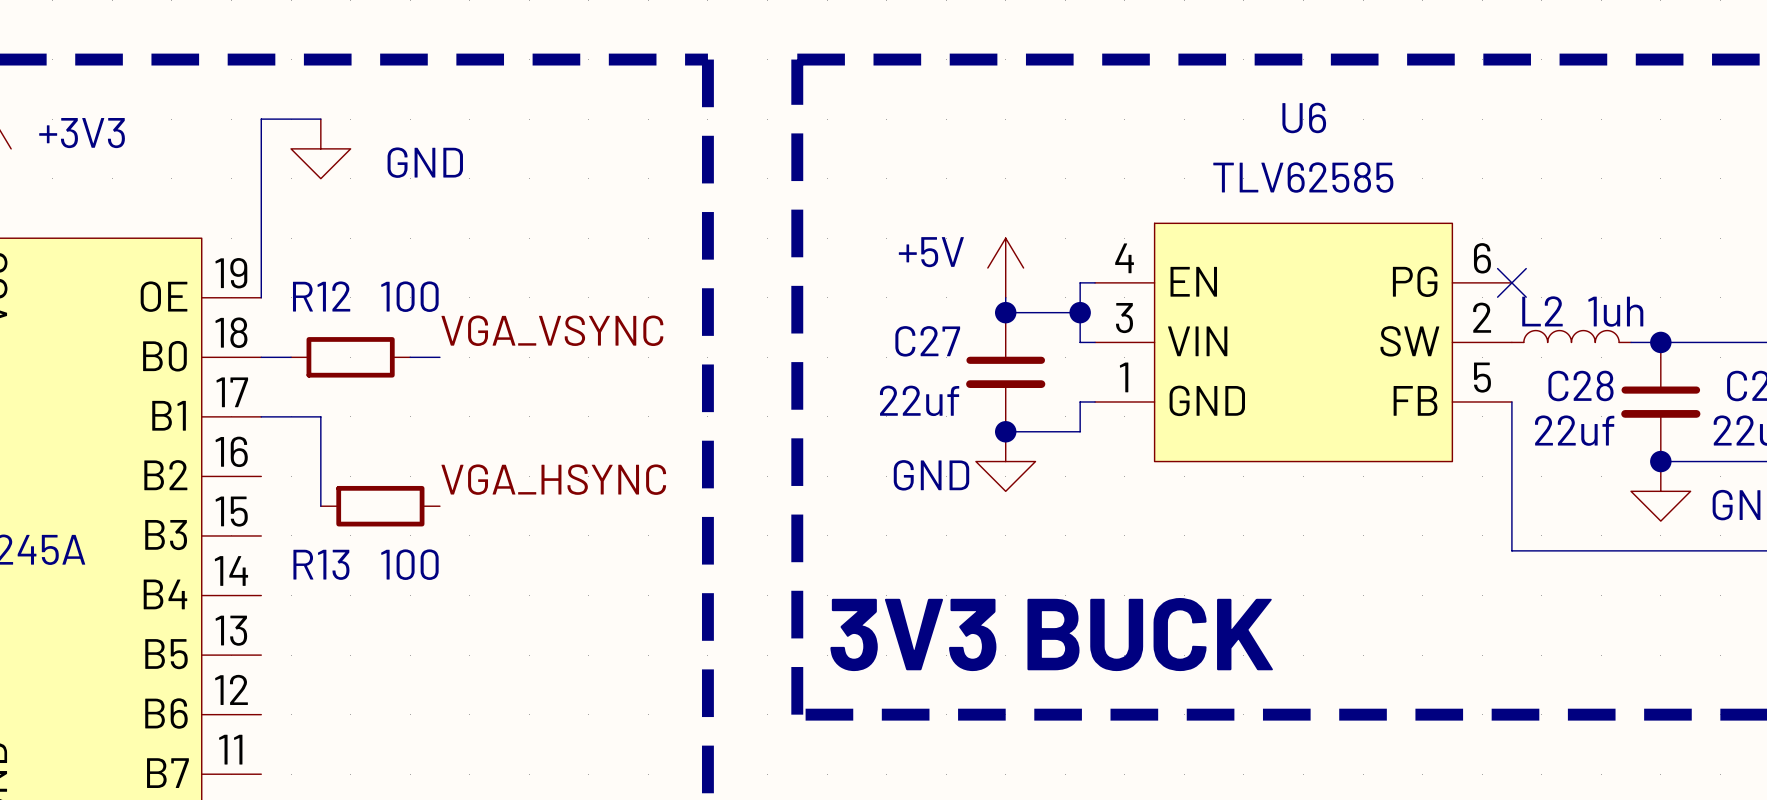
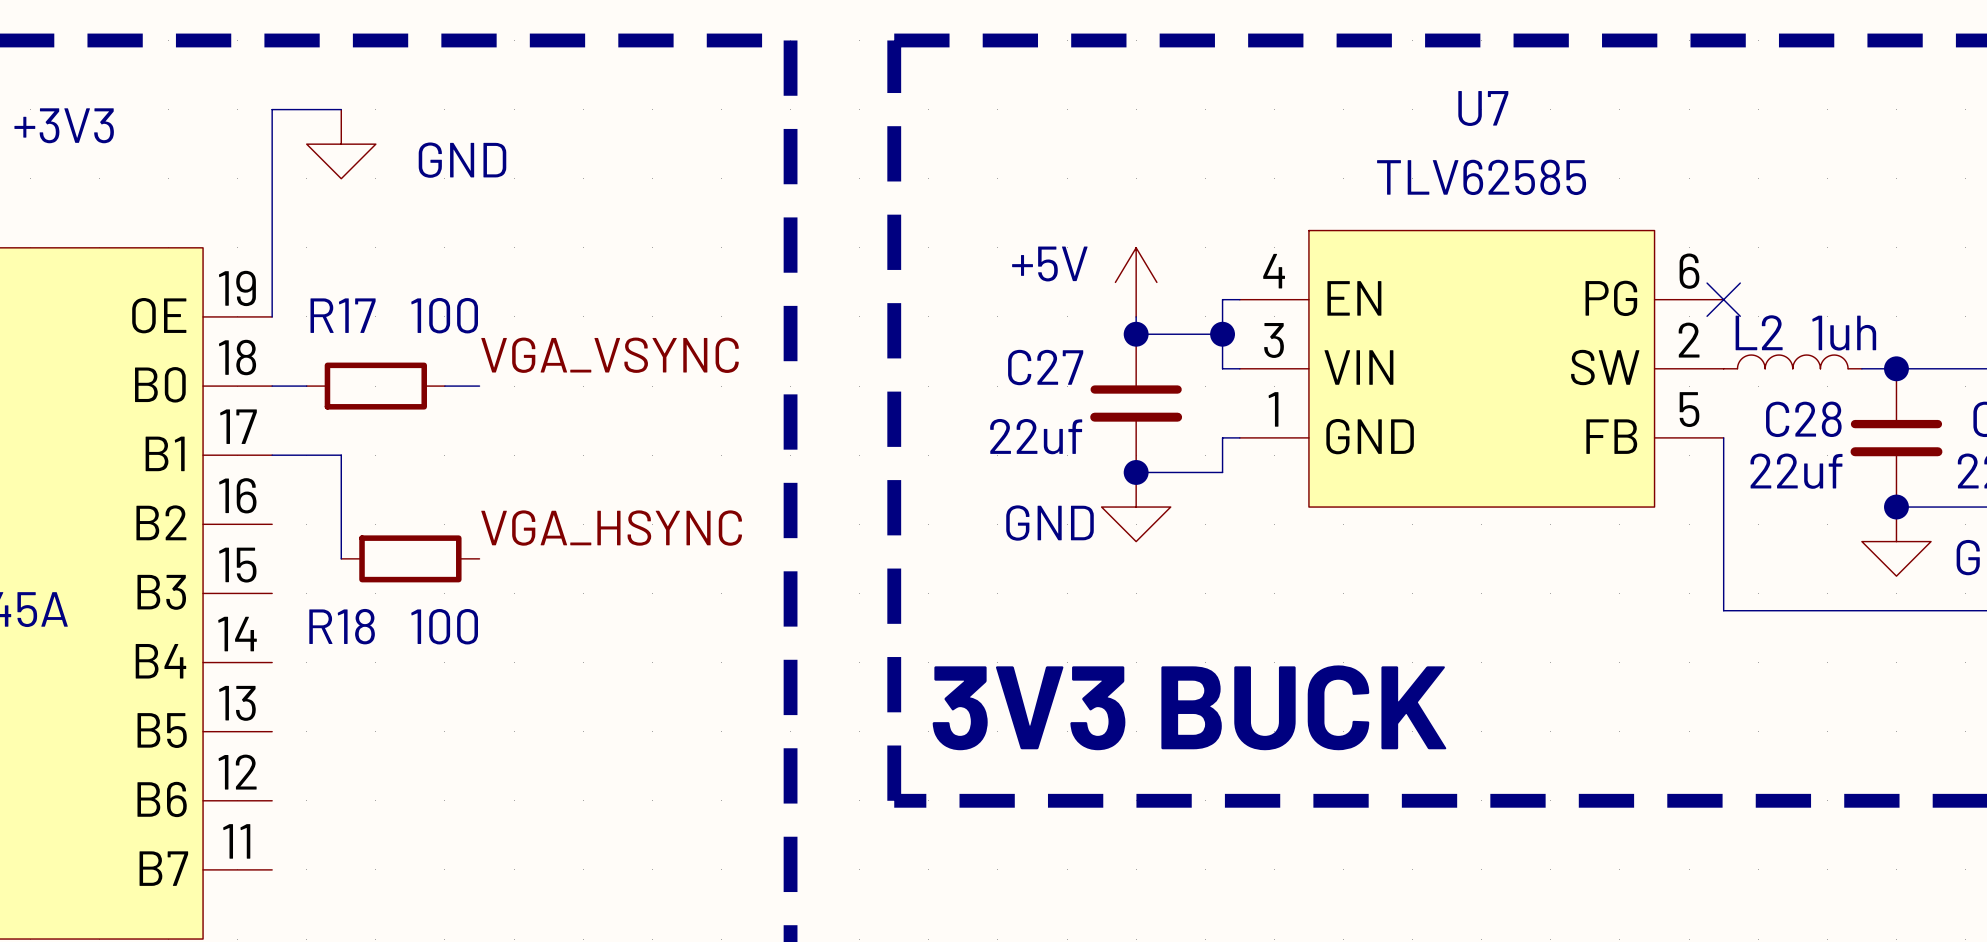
U6 name: U6 (1304, 118) -> U7 (1483, 108)
R12 name: R12 (321, 296) -> R17 (343, 315)
R13 name: R13 (321, 564) -> R18 (342, 626)

